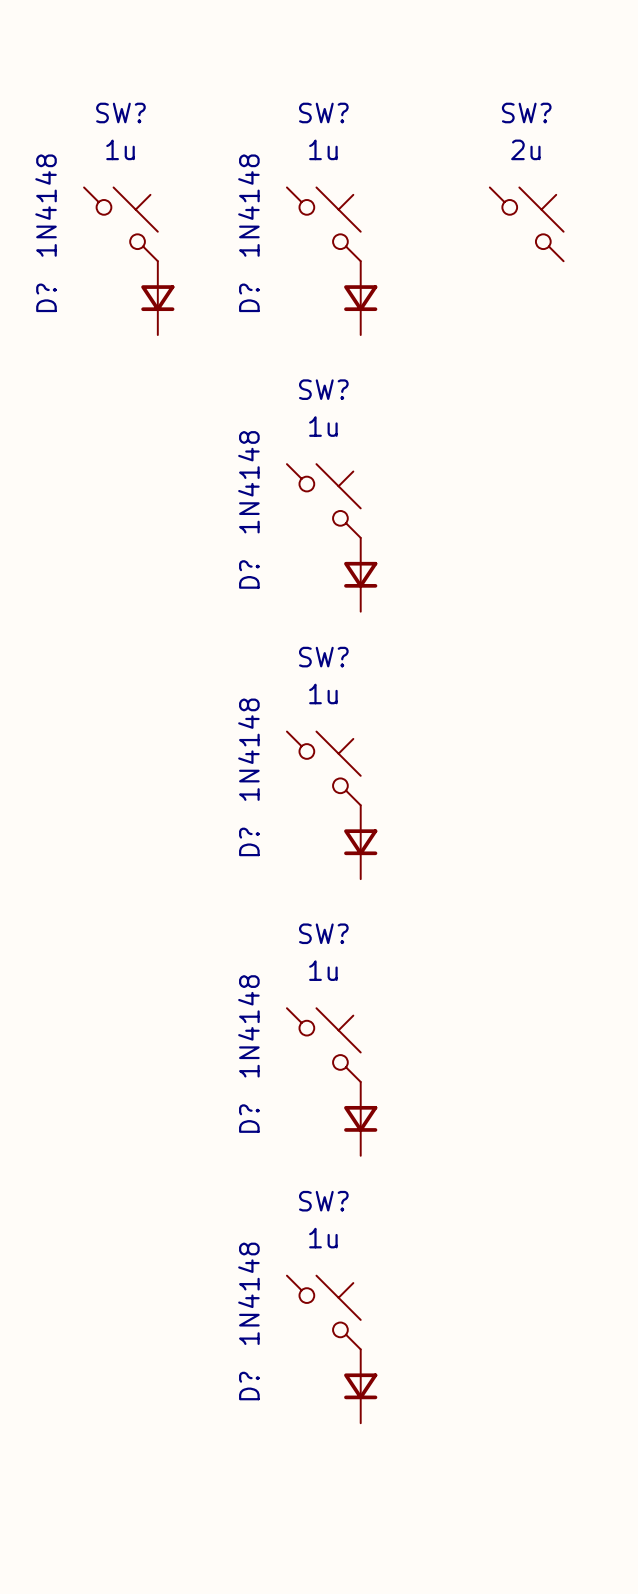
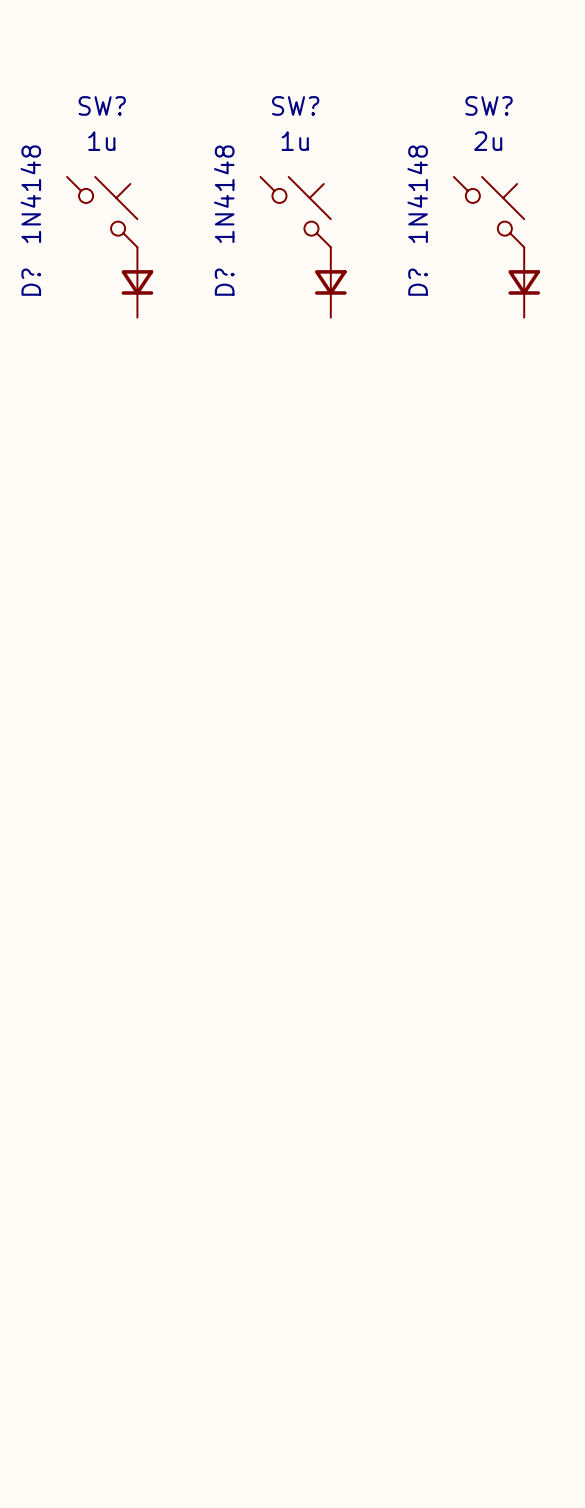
D?: none -> 1N4148 (524, 282)
SW?: 1u (323, 501) -> none
D?: 1N4148 (360, 574) -> none
SW?: 1u (323, 768) -> none
D?: 1N4148 (360, 842) -> none
SW?: 1u (323, 1045) -> none
D?: 1N4148 (360, 1118) -> none
SW?: 1u (323, 1312) -> none
D?: 1N4148 (360, 1386) -> none

